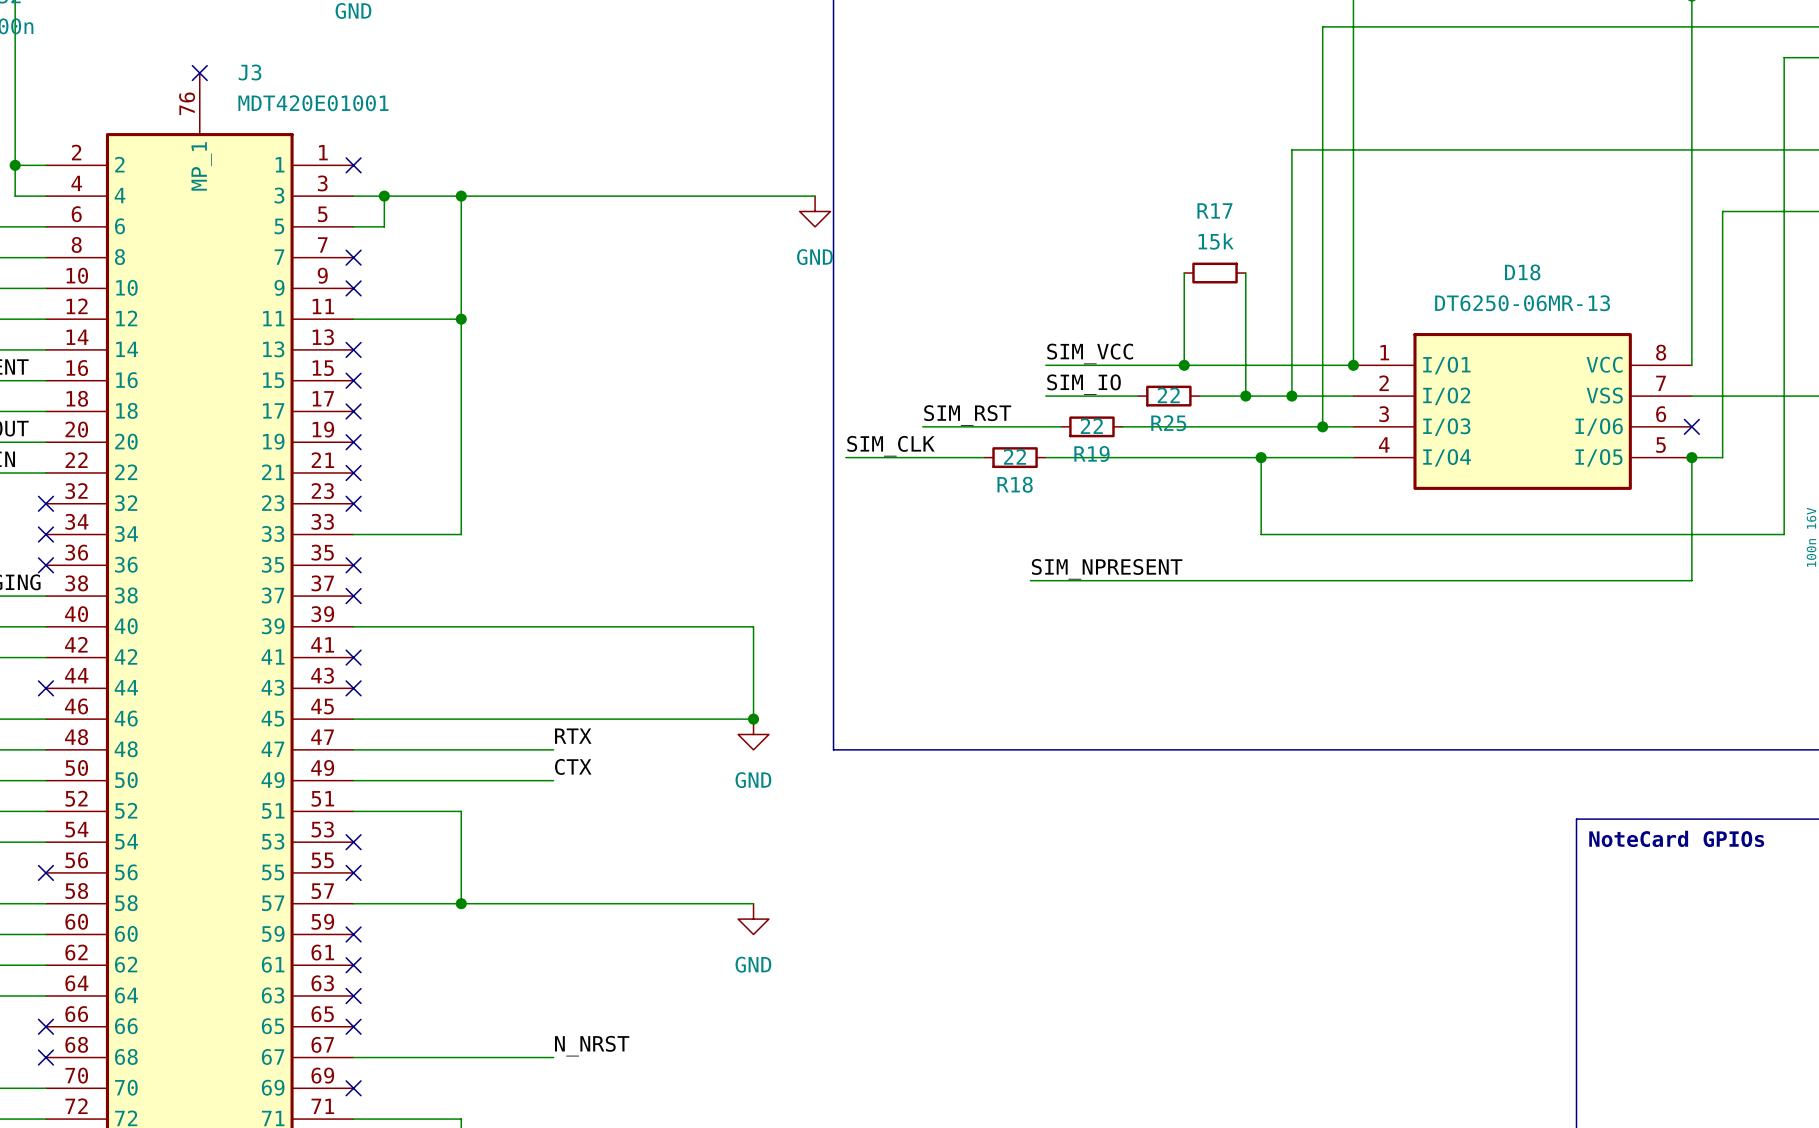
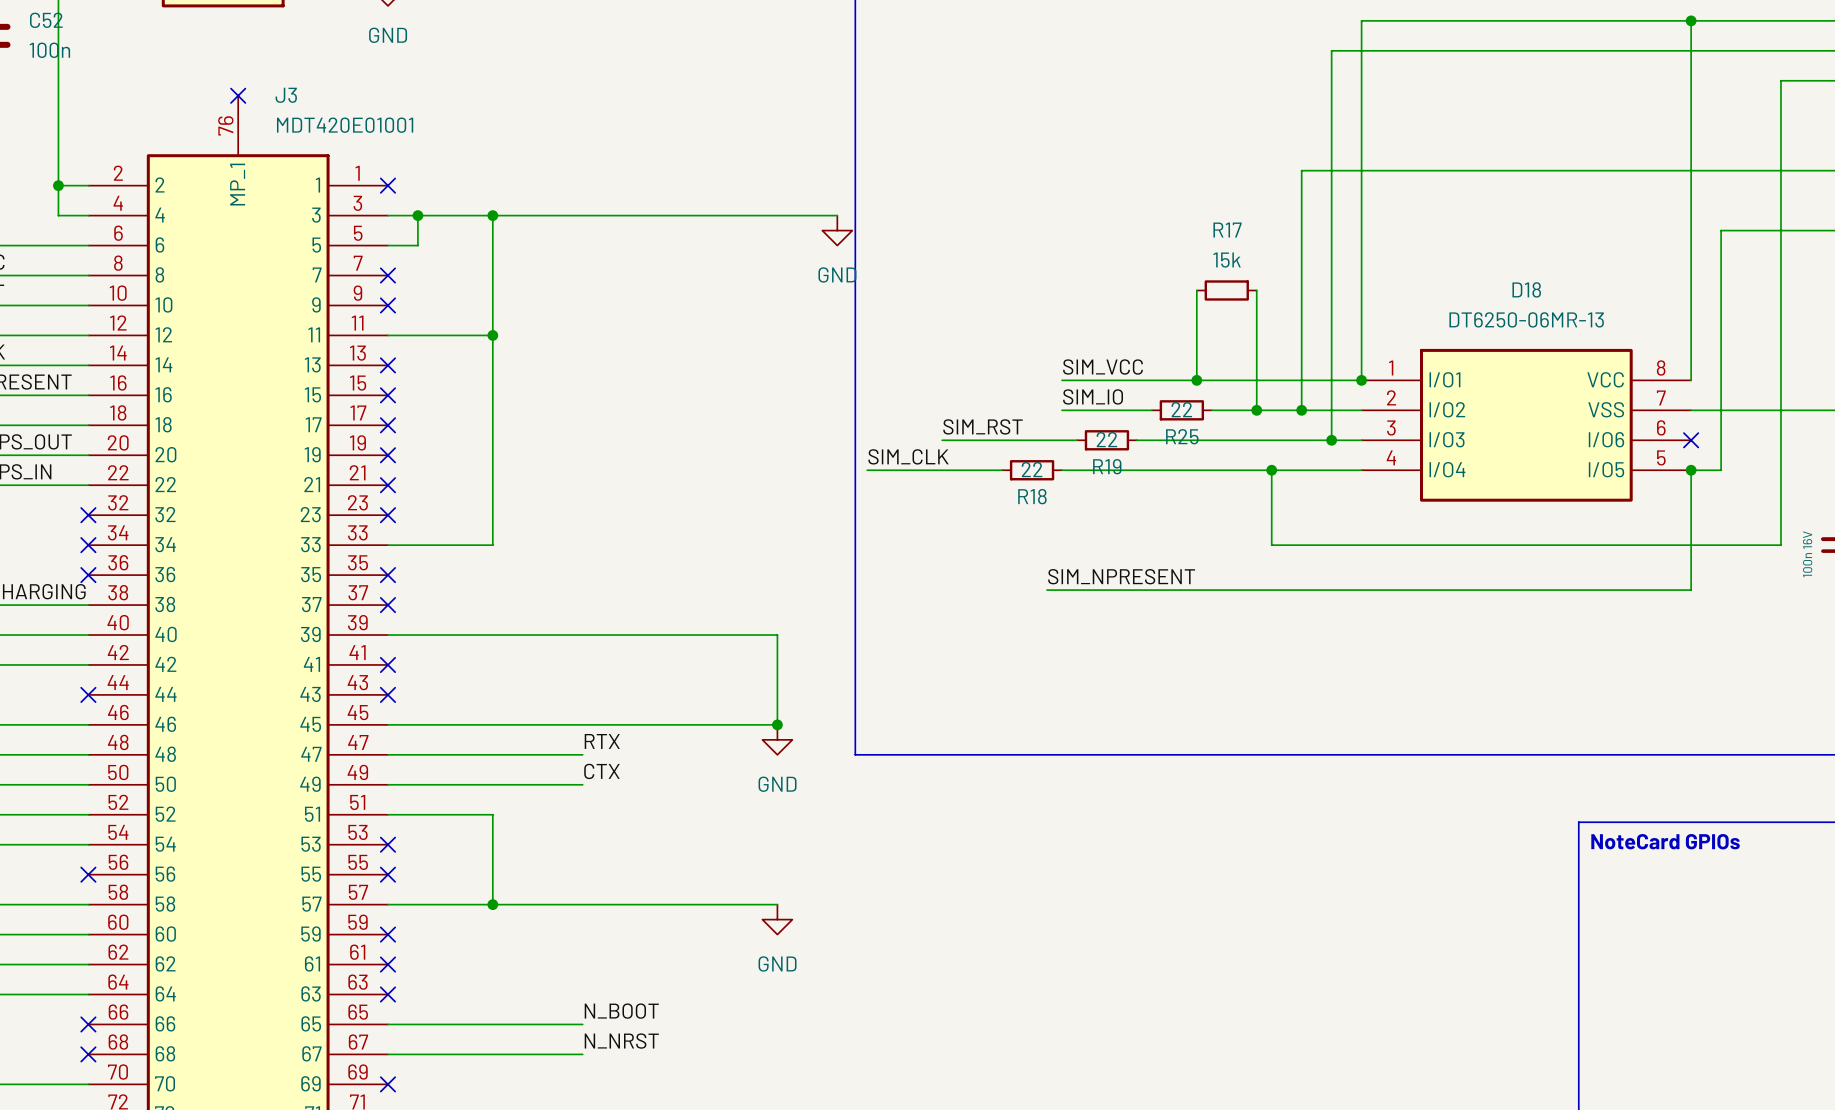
label: none -> N_BOOT (621, 1011)
wire: none -> (387, 1024) (582, 1024)
no-connect mark: (353, 1026) -> none

